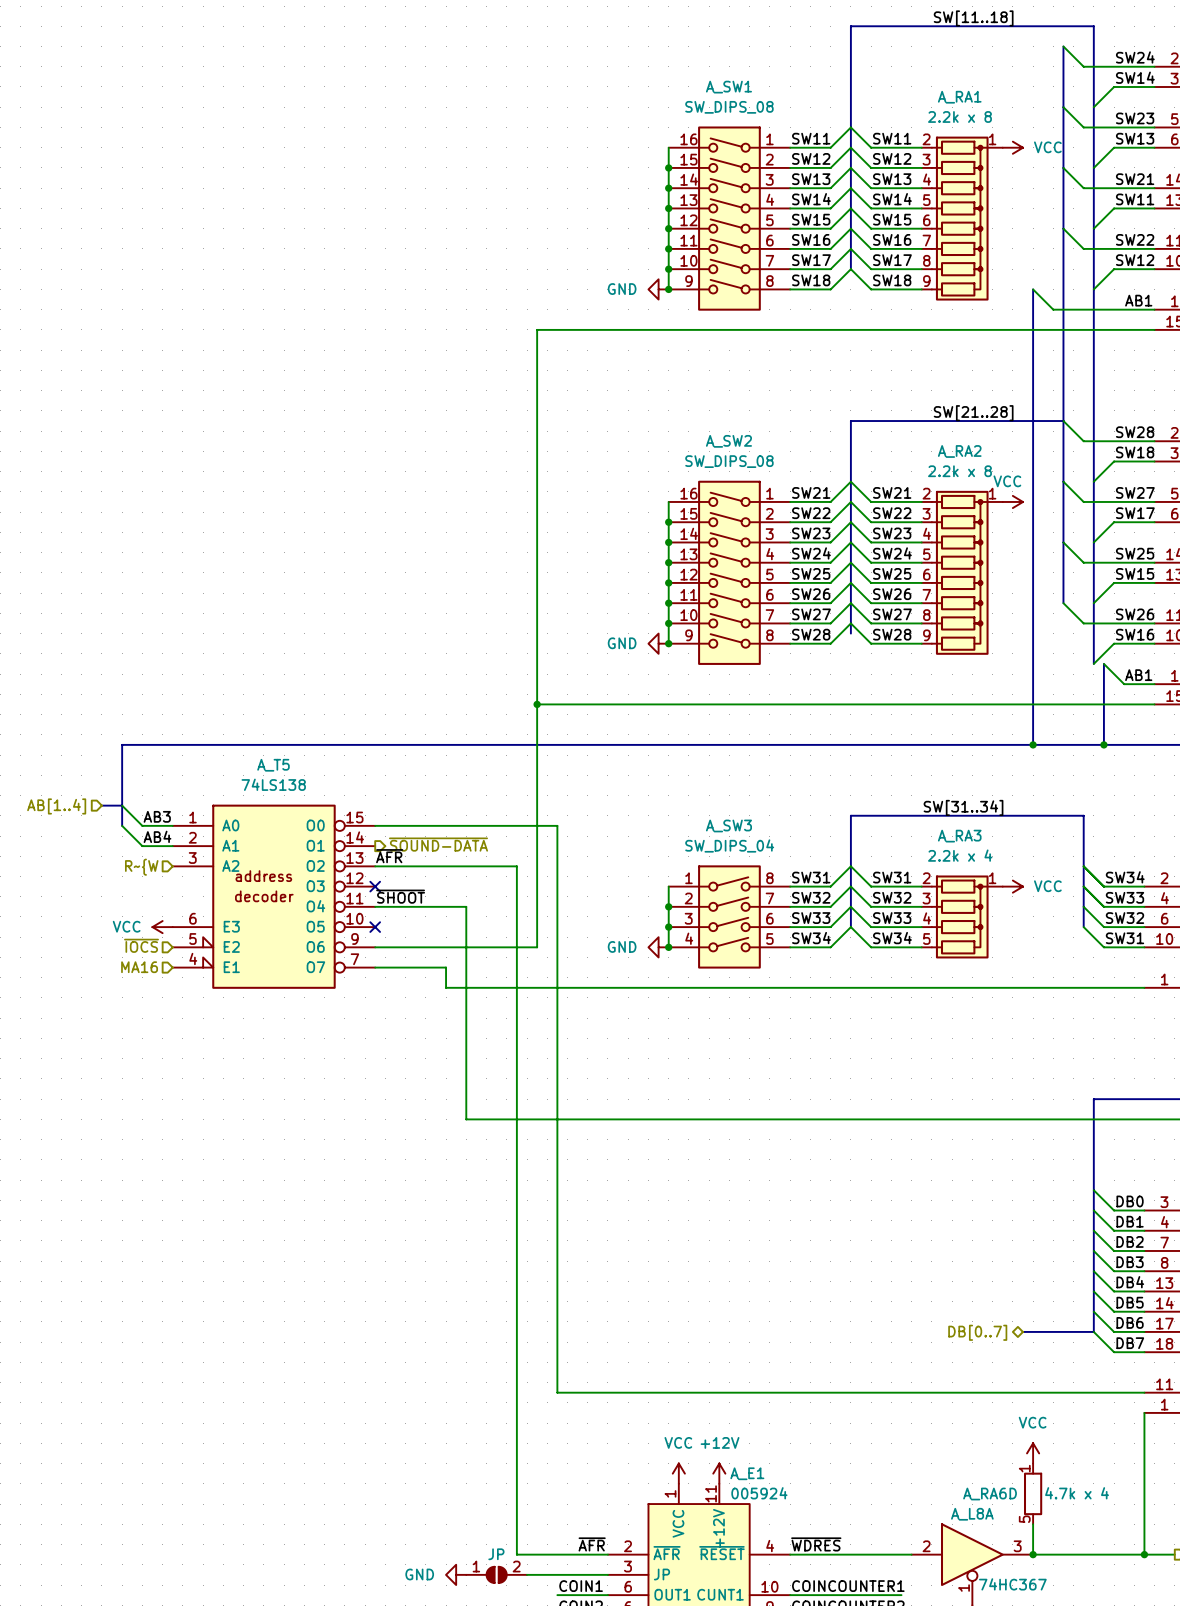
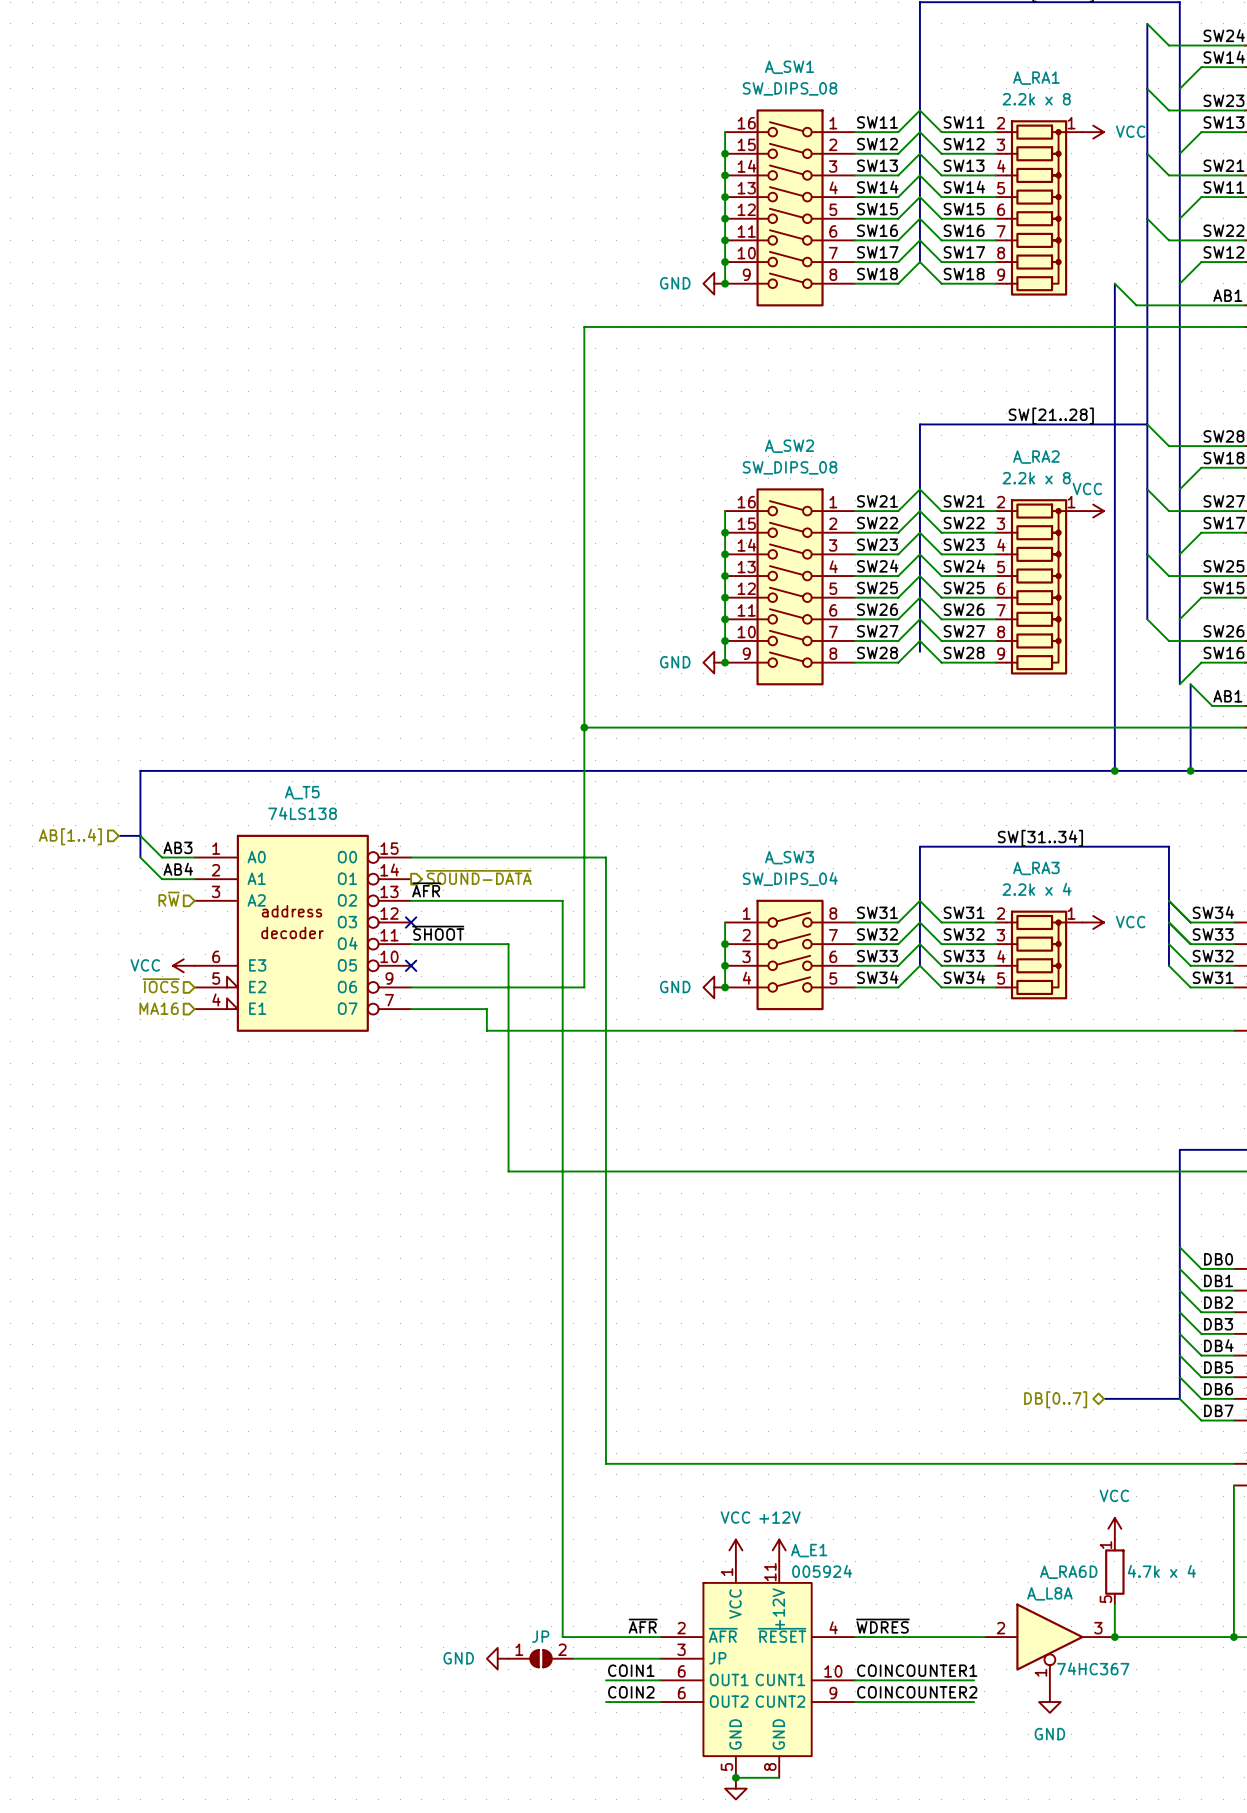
hierarchical label: R~{W (141, 867) -> R~{W} (169, 899)

